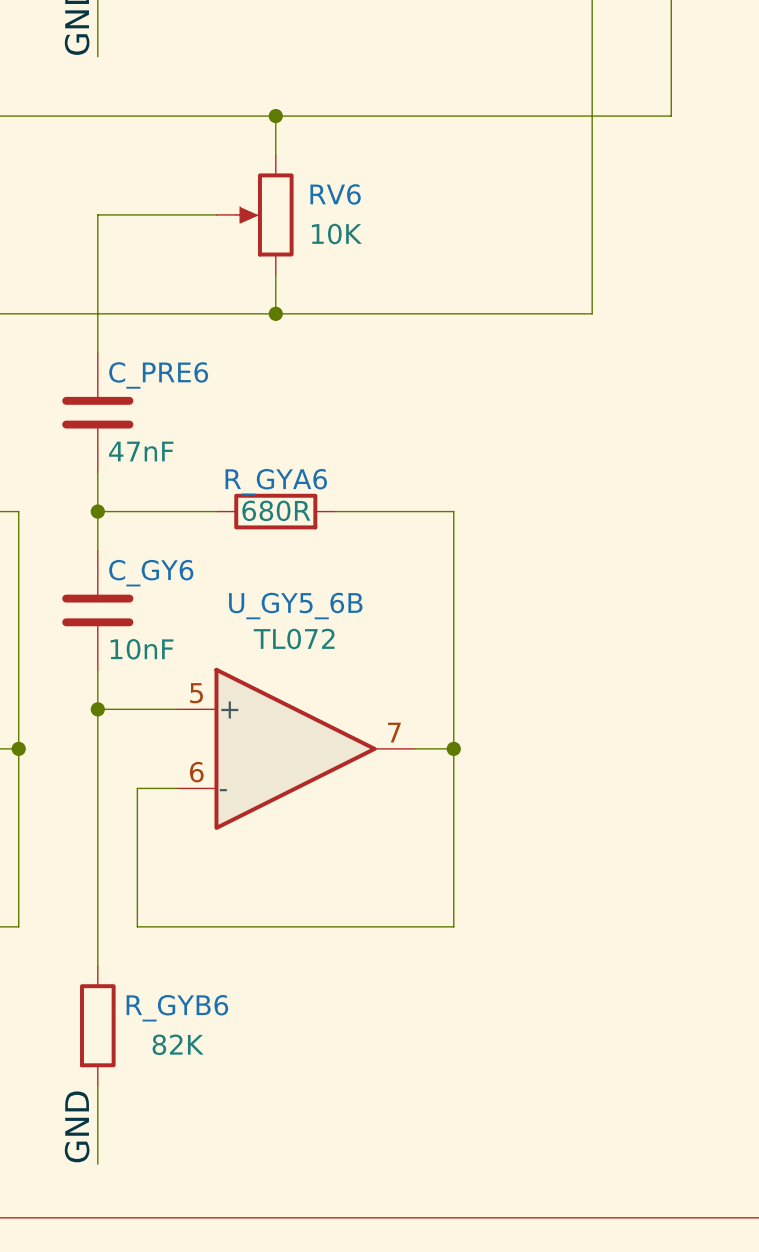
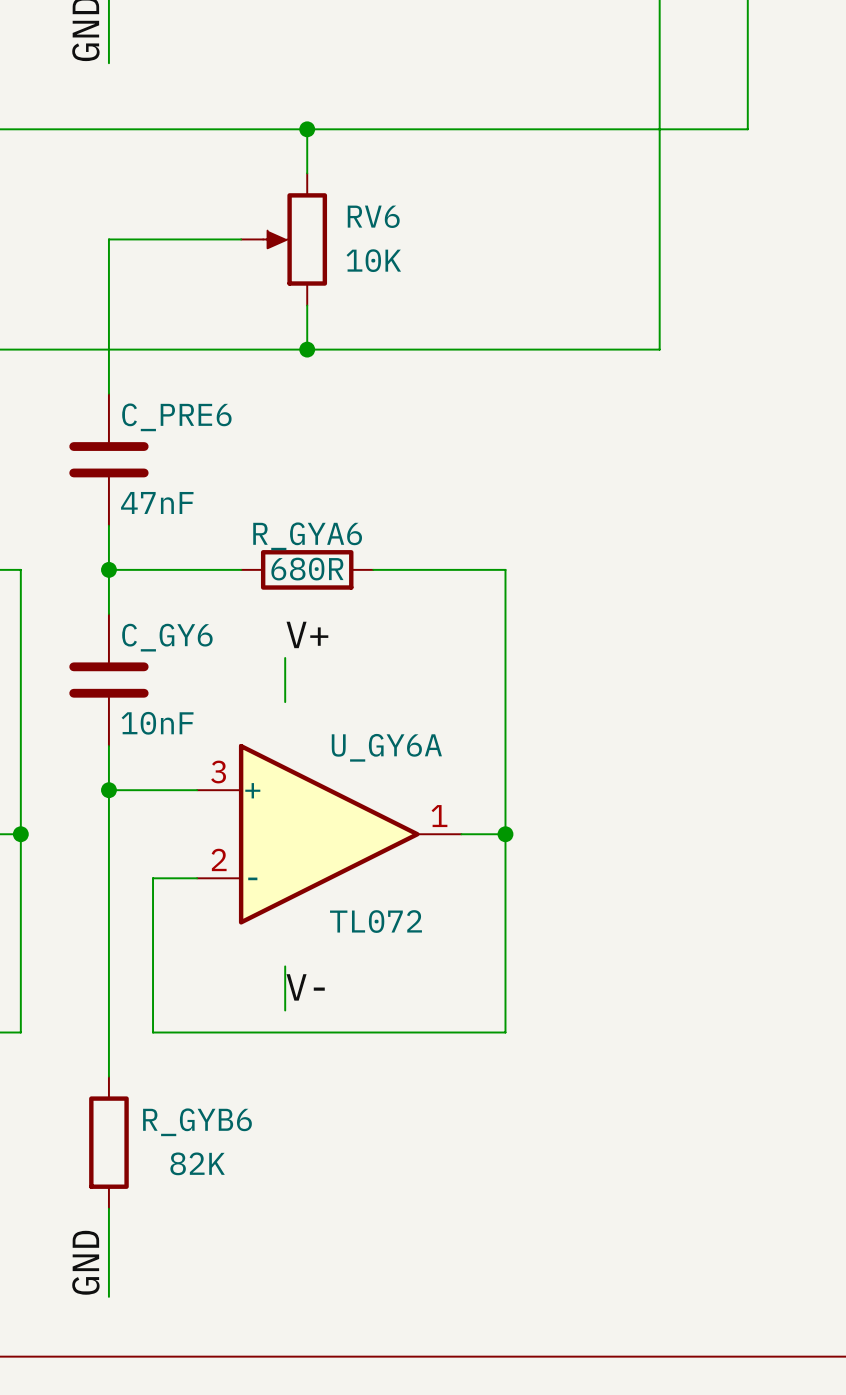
label: none -> V+ (307, 634)
wire: none -> (285, 658) (285, 702)
U_GY5_6B name: U_GY5_6B (295, 606) -> U_GY6A (386, 747)
U_GY5_6B value position: TL072 (294, 638) -> TL072 (375, 921)
U_GY5_6B pin number: 5 (196, 693) -> 3 (218, 772)
U_GY5_6B pin number: 7 (394, 732) -> 1 (439, 816)
U_GY5_6B pin number: 6 (196, 772) -> 2 (219, 859)
wire: none -> (285, 966) (285, 1010)
label: none -> V- (305, 987)

